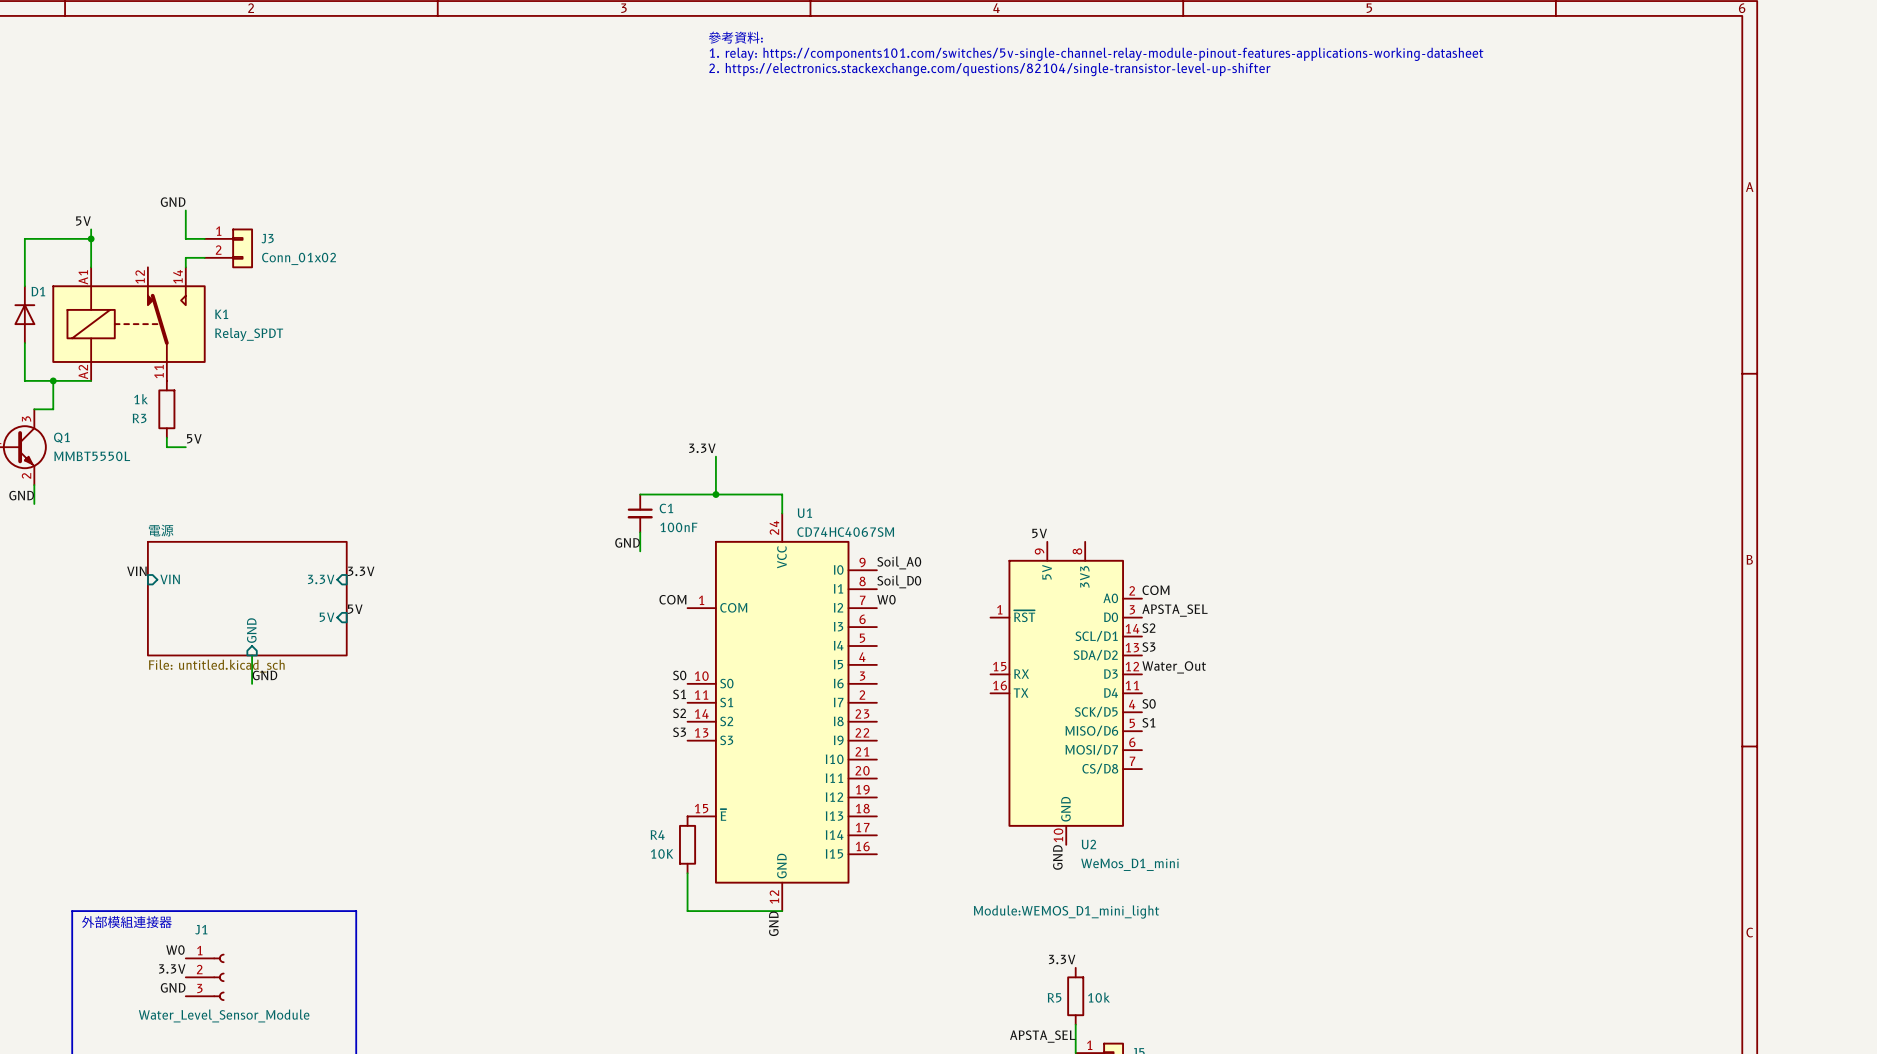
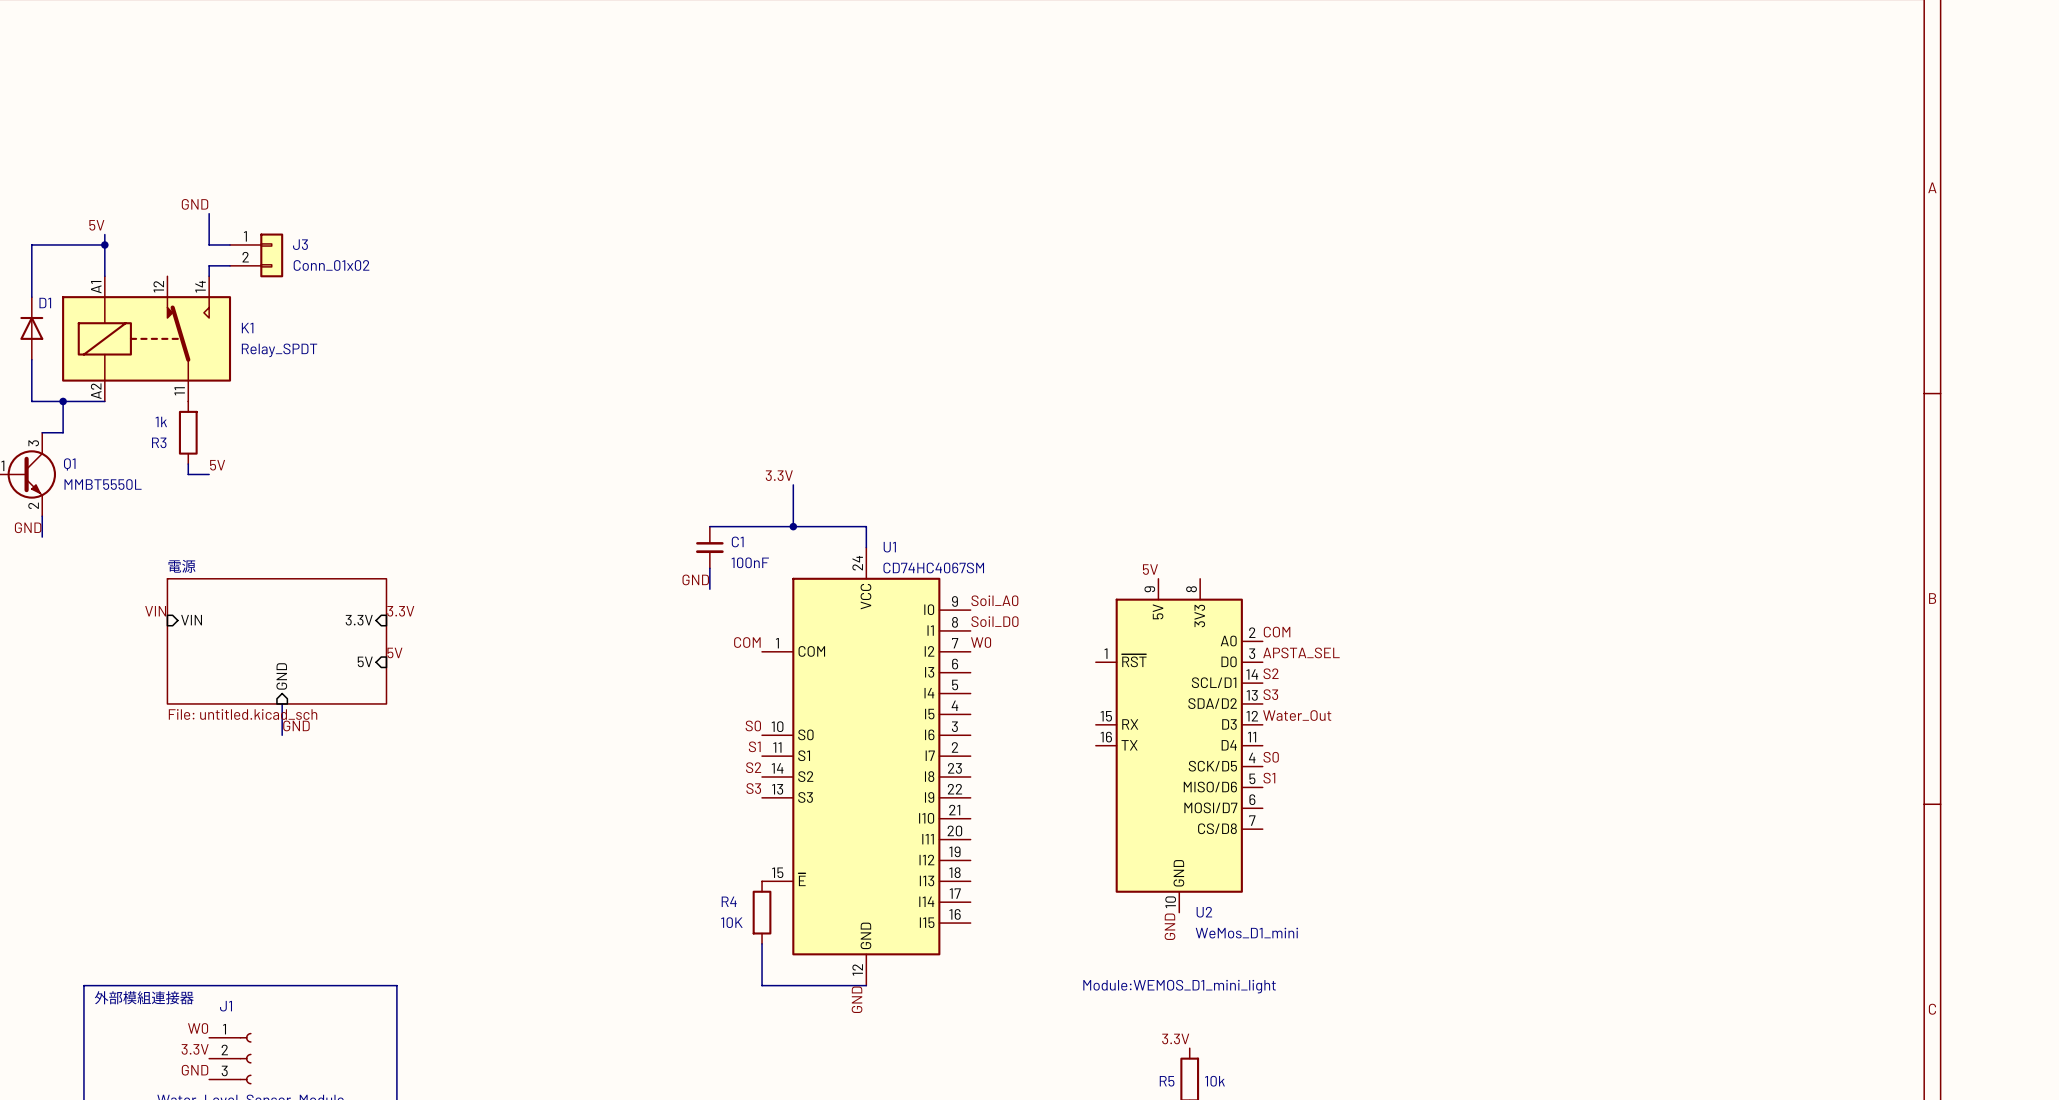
text: 參考資料: (735, 37) -> none
text: 1. relay: https://components101.com/switches/5v-single-channel-relay-module-pinout-features-applications-working-datasheet (1096, 54) -> none
text: 2. https://electronics.stackexchange.com/questions/82104/single-transistor-level-up-shifter (989, 69) -> none

